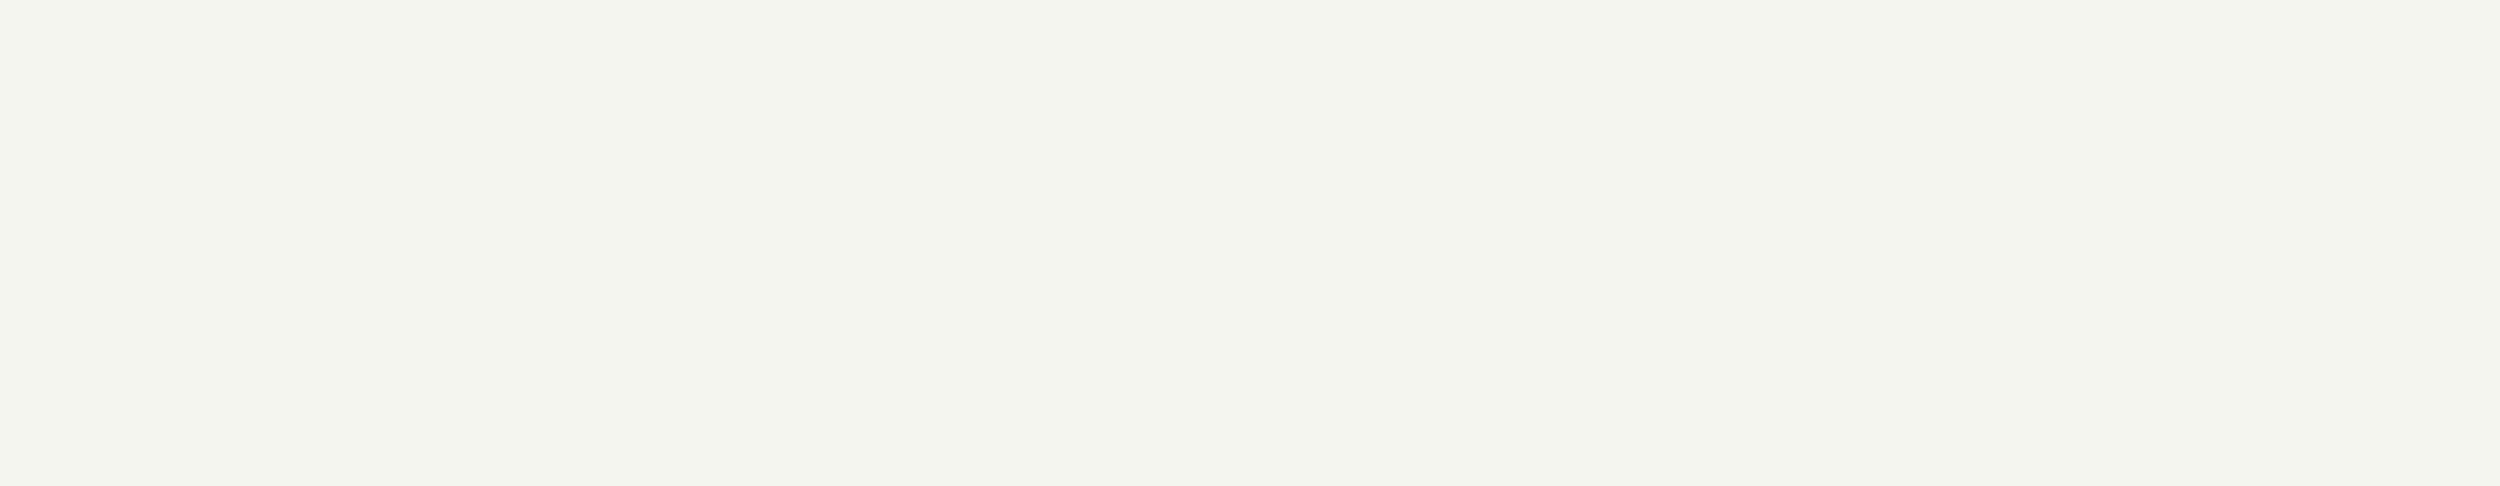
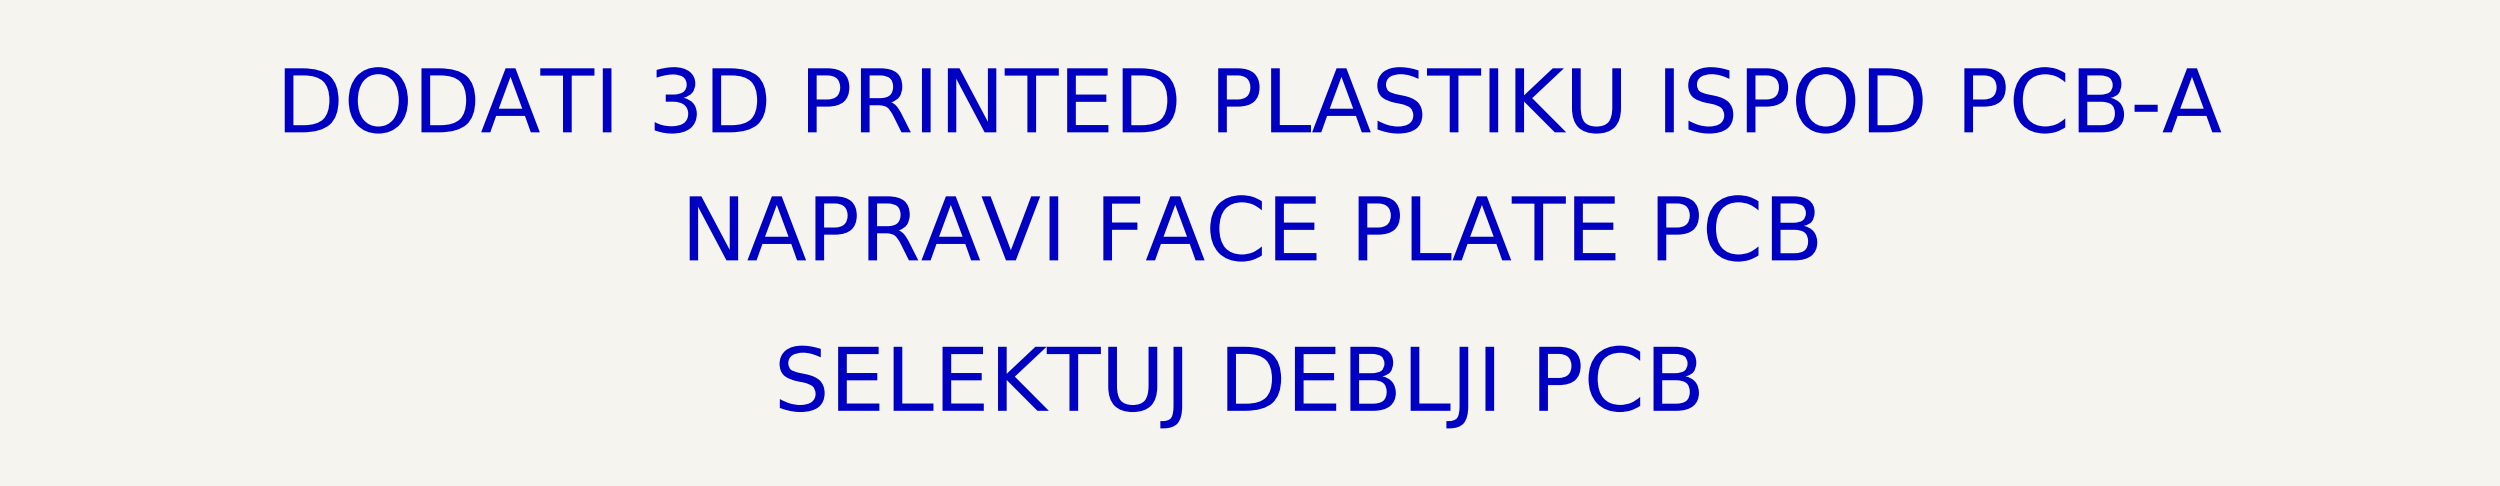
text: none -> DODATI 3D PRINTED PLASTIKU ISPOD PCB-A (1253, 100)
text: none -> NAPRAVI FACE PLATE PCB (1253, 228)
text: none -> SELEKTUJ DEBLJI PCB (1239, 387)

